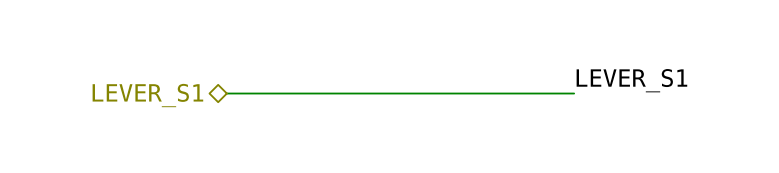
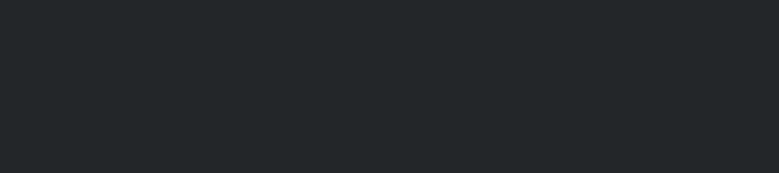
label: LEVER_S1 (631, 80) -> none
wire: (226, 93) (574, 93) -> none
hierarchical label: LEVER_S1 (147, 95) -> none

